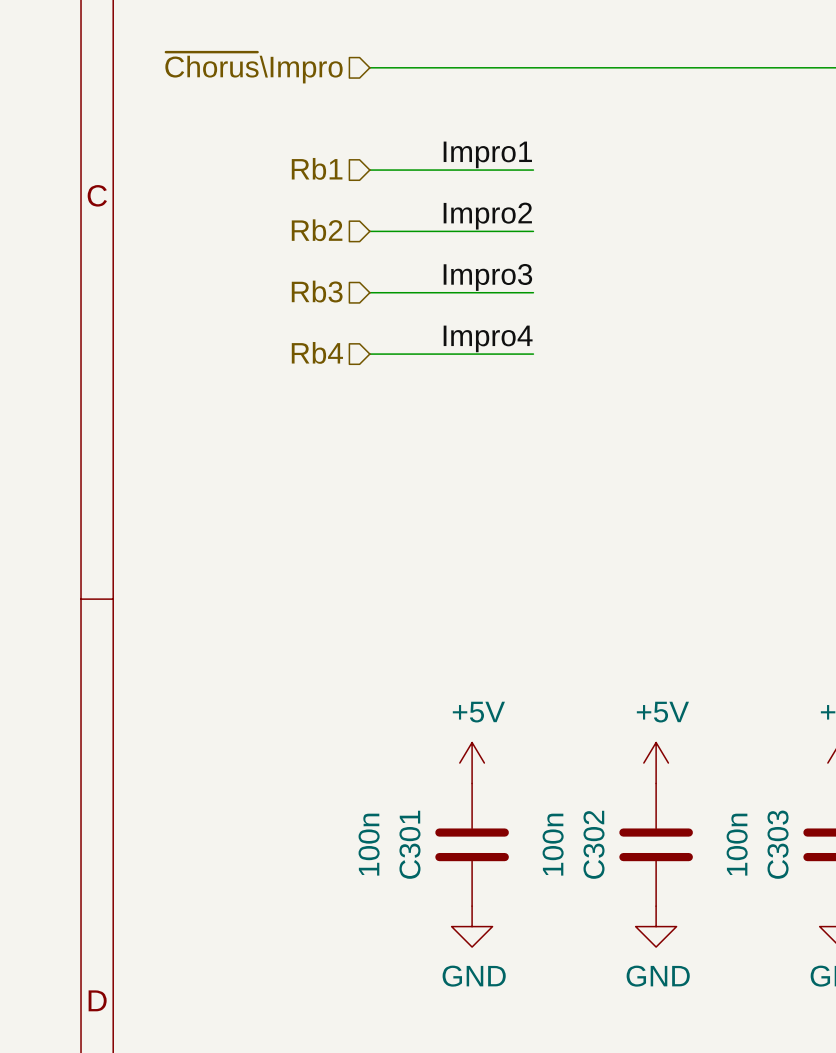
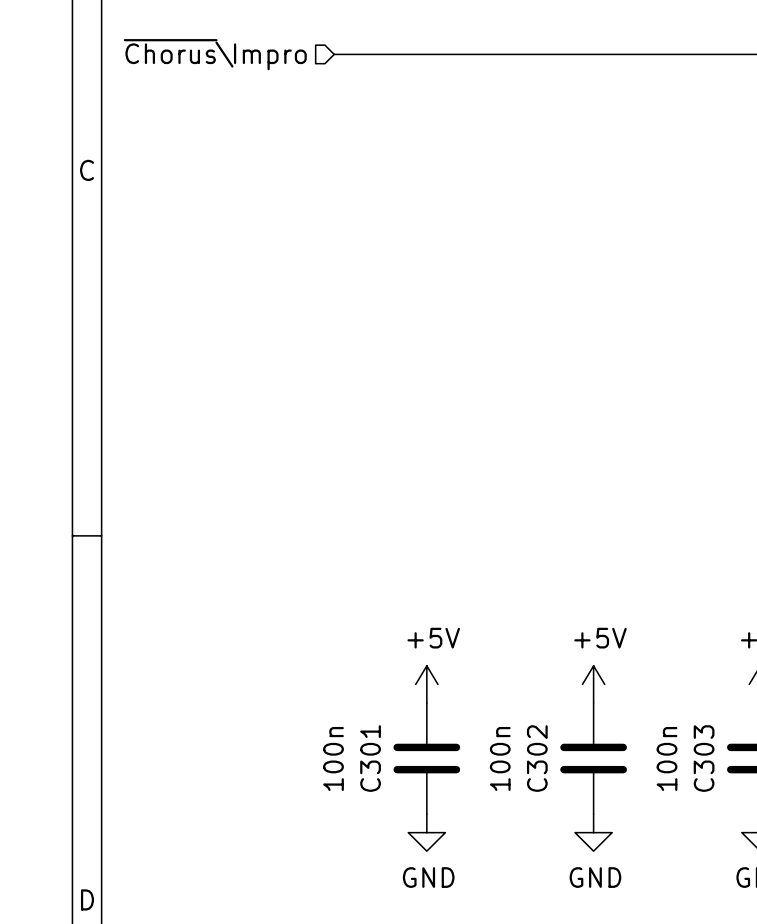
label: Impro1 (487, 154) -> none
hierarchical label: Rb1 (317, 168) -> none
wire: (369, 170) (533, 170) -> none
label: Impro2 (487, 216) -> none
hierarchical label: Rb2 (317, 230) -> none
wire: (369, 231) (533, 231) -> none
label: Impro3 (487, 277) -> none
hierarchical label: Rb3 (317, 291) -> none
wire: (369, 292) (533, 292) -> none
label: Impro4 (488, 338) -> none
hierarchical label: Rb4 (317, 352) -> none
wire: (369, 354) (533, 354) -> none

